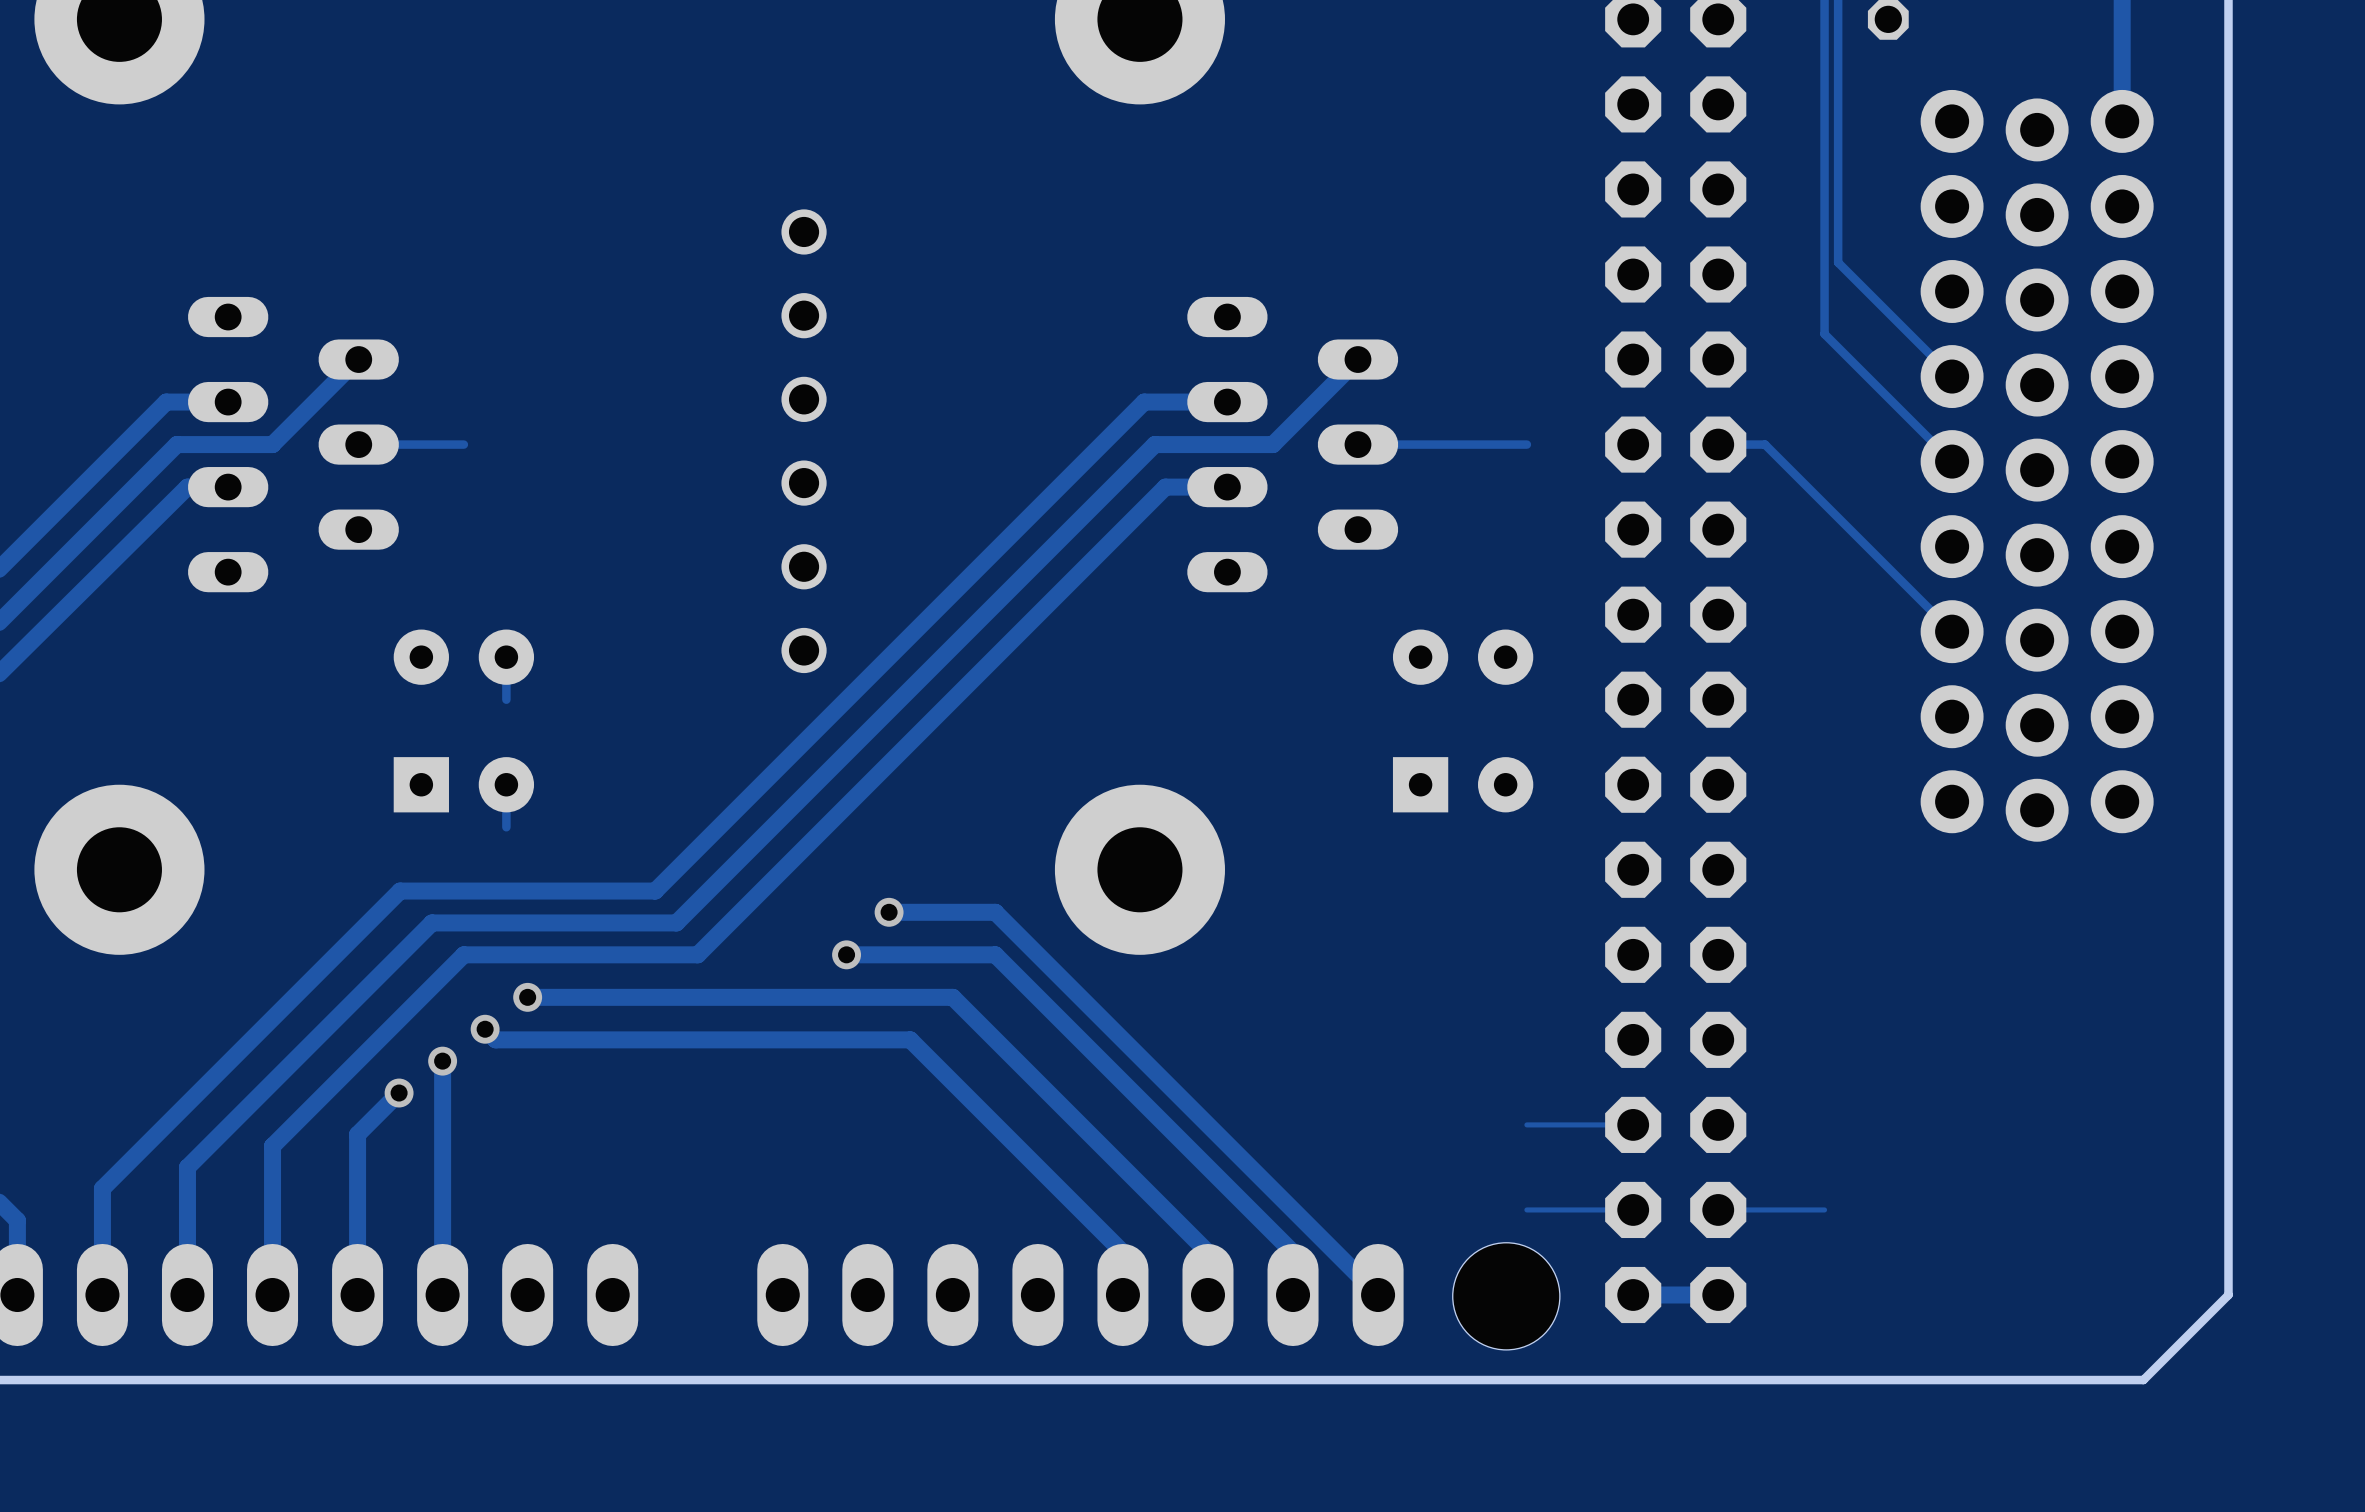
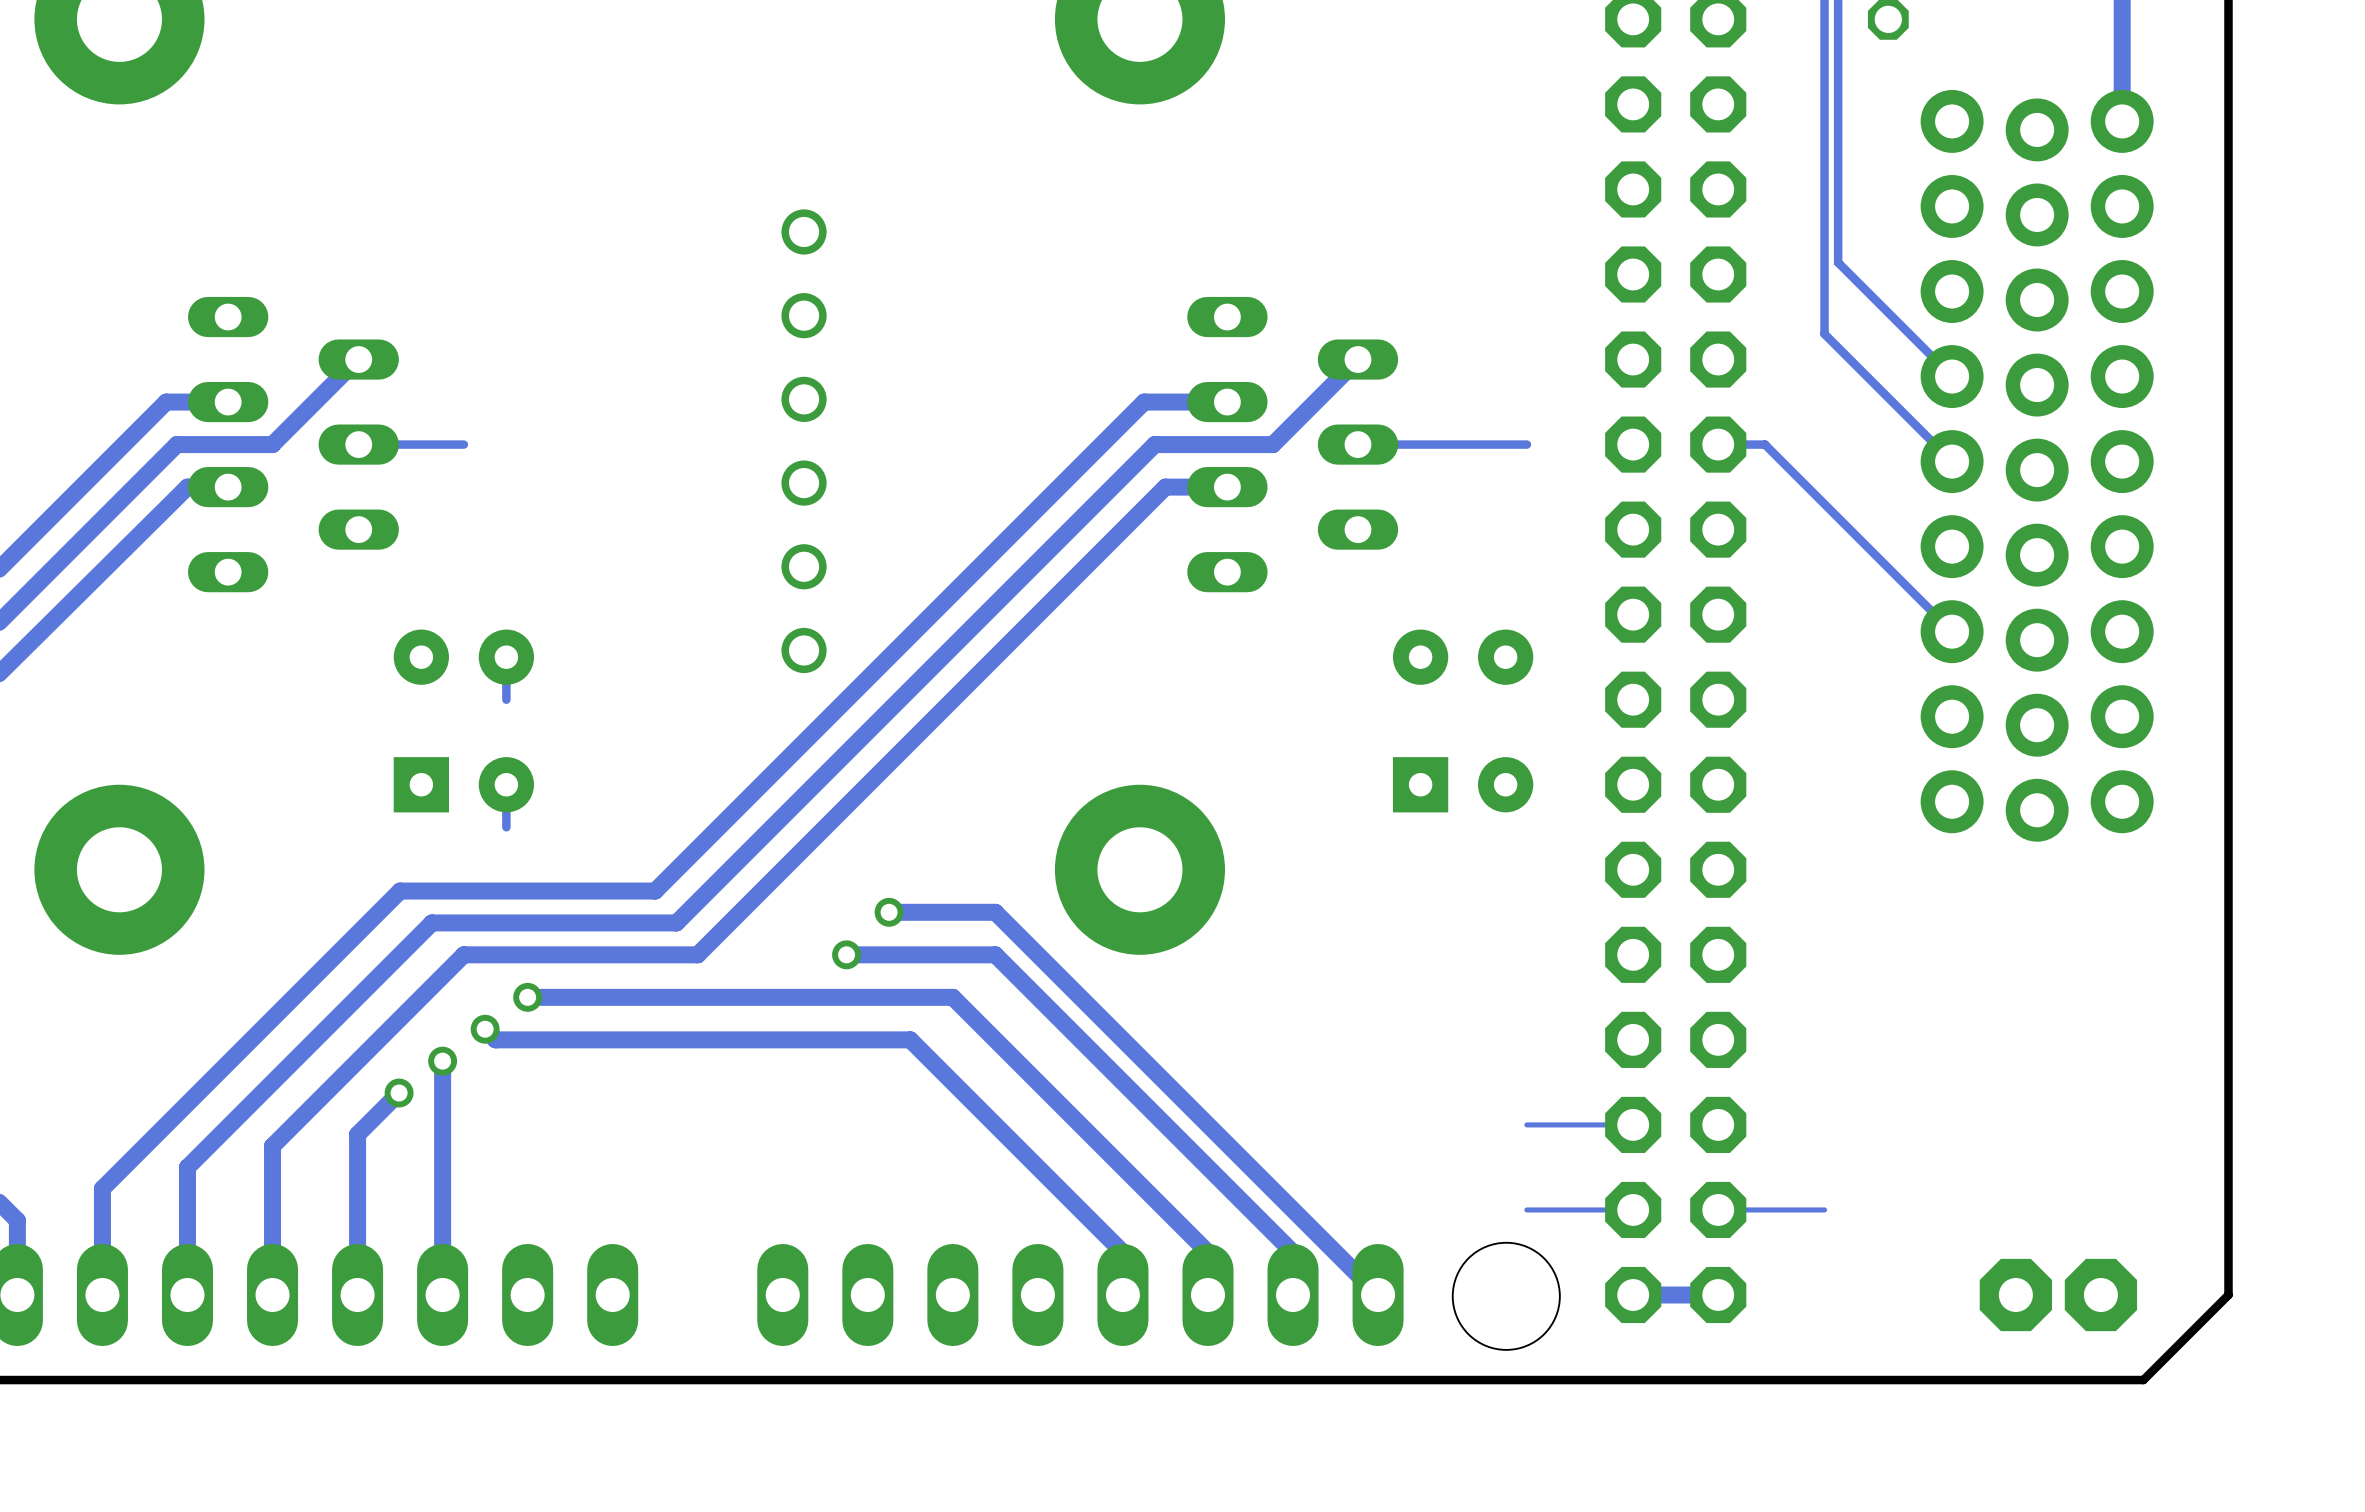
part: none -> (2015, 1295)
part: none -> (2100, 1295)

